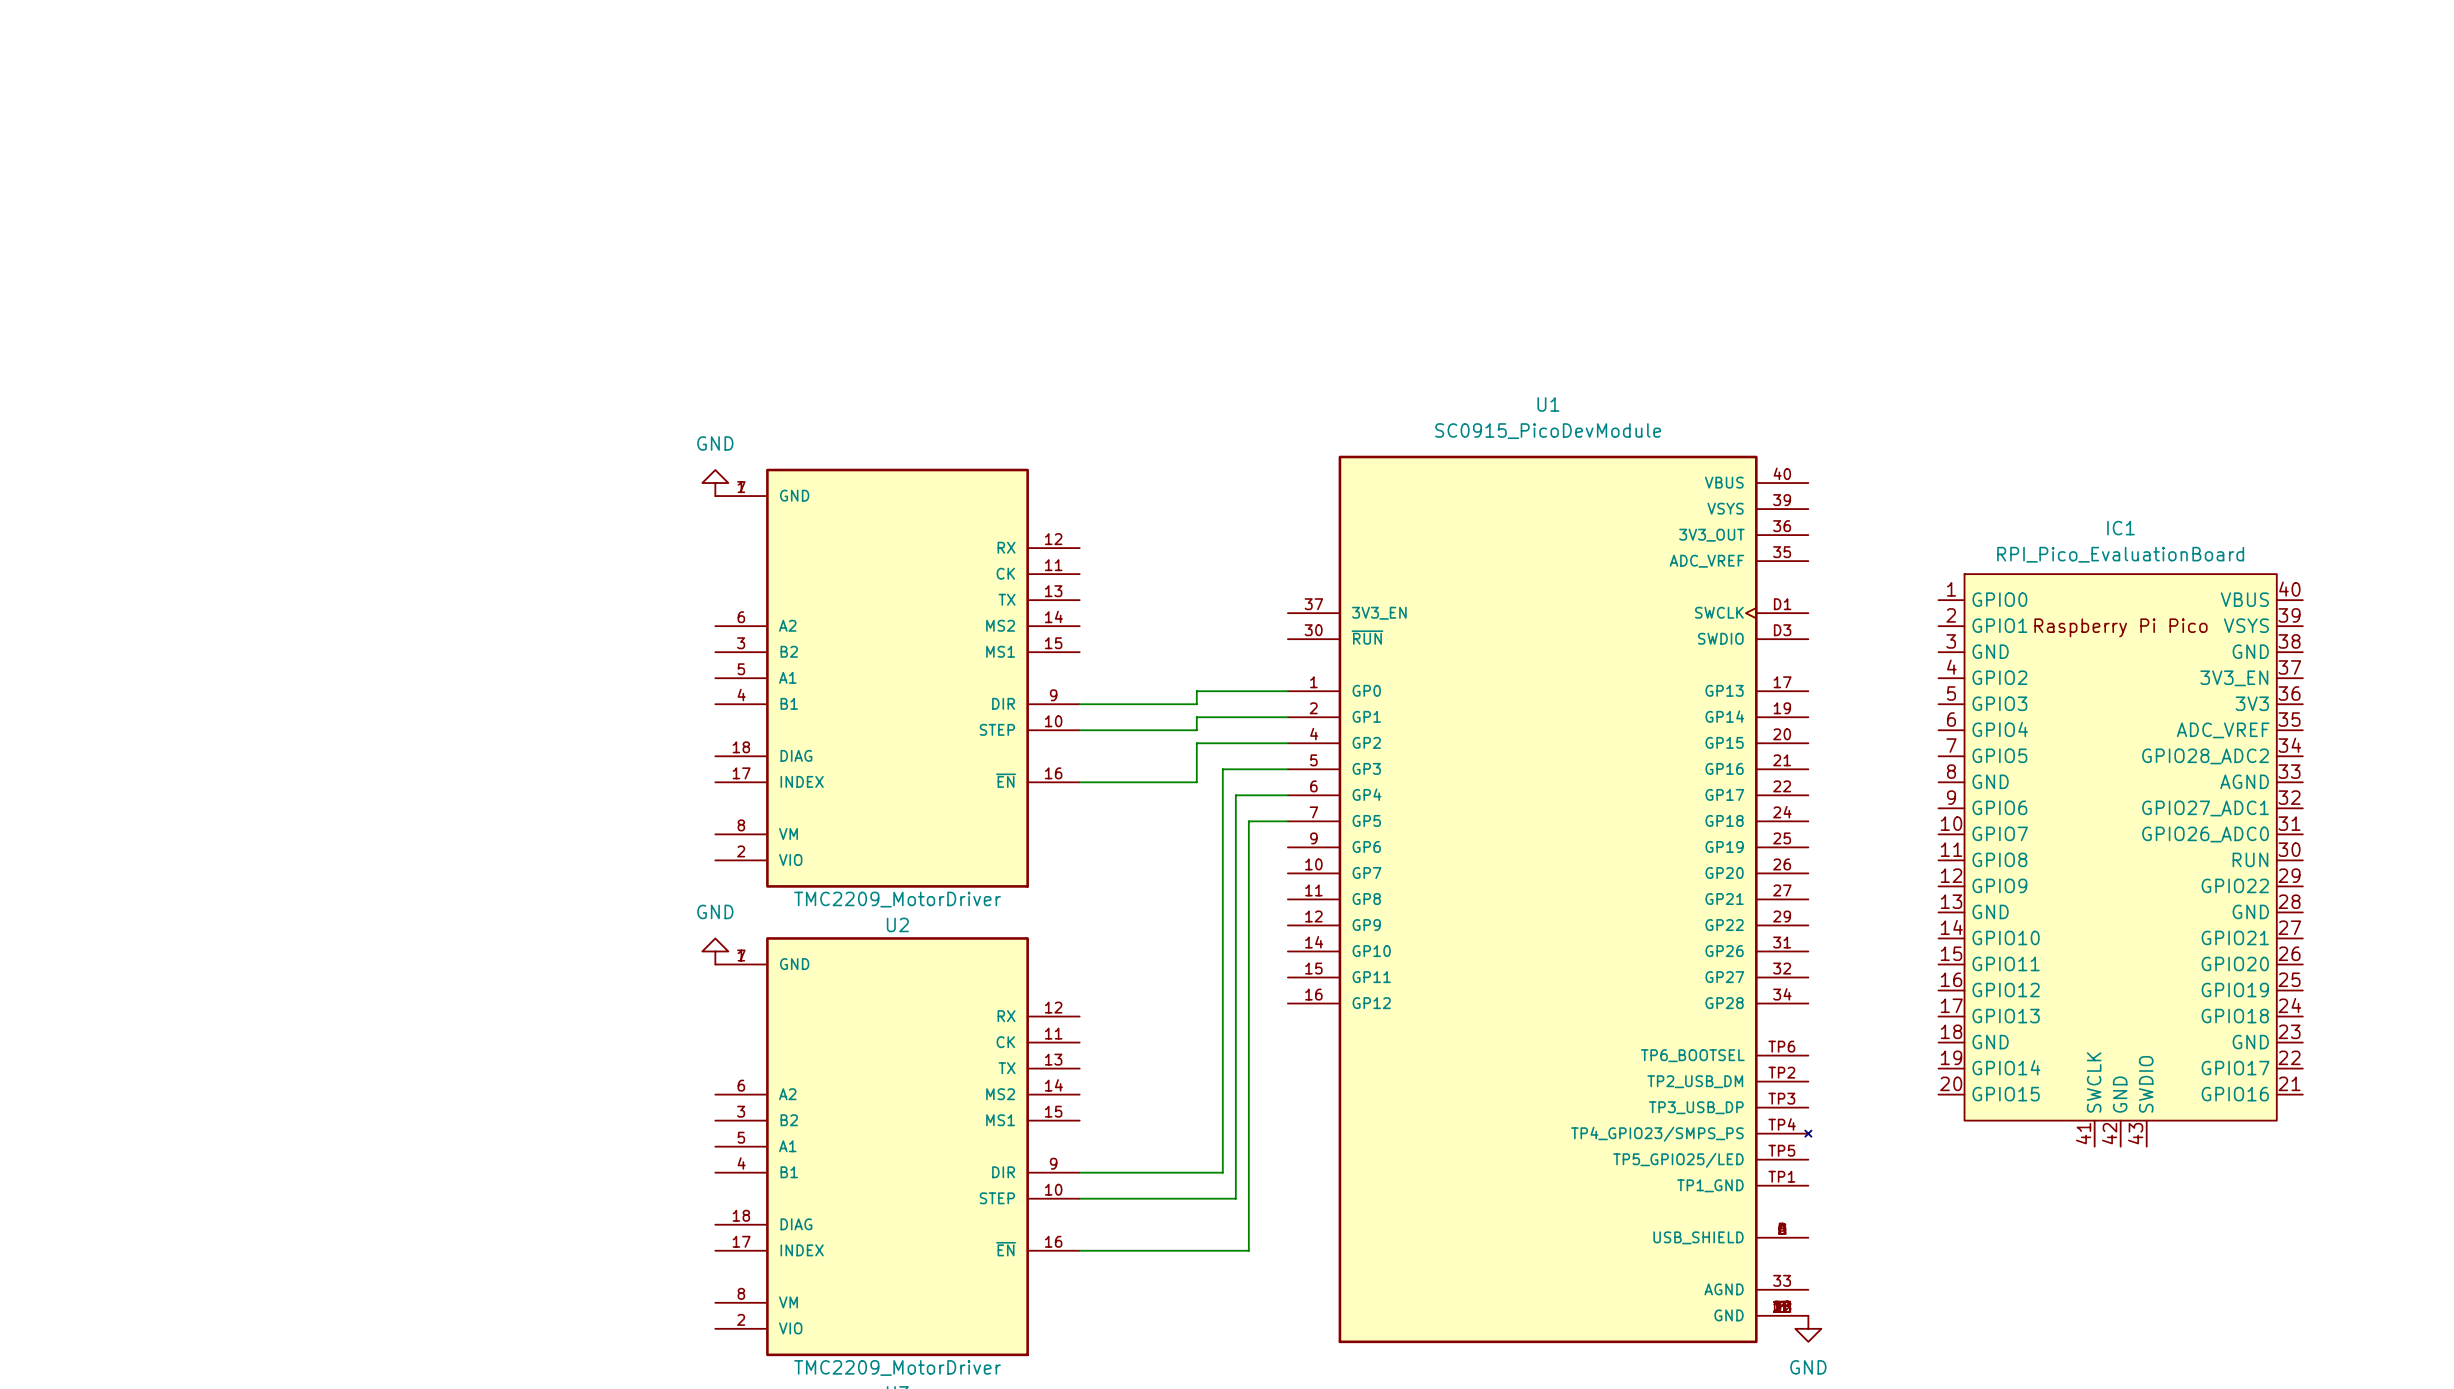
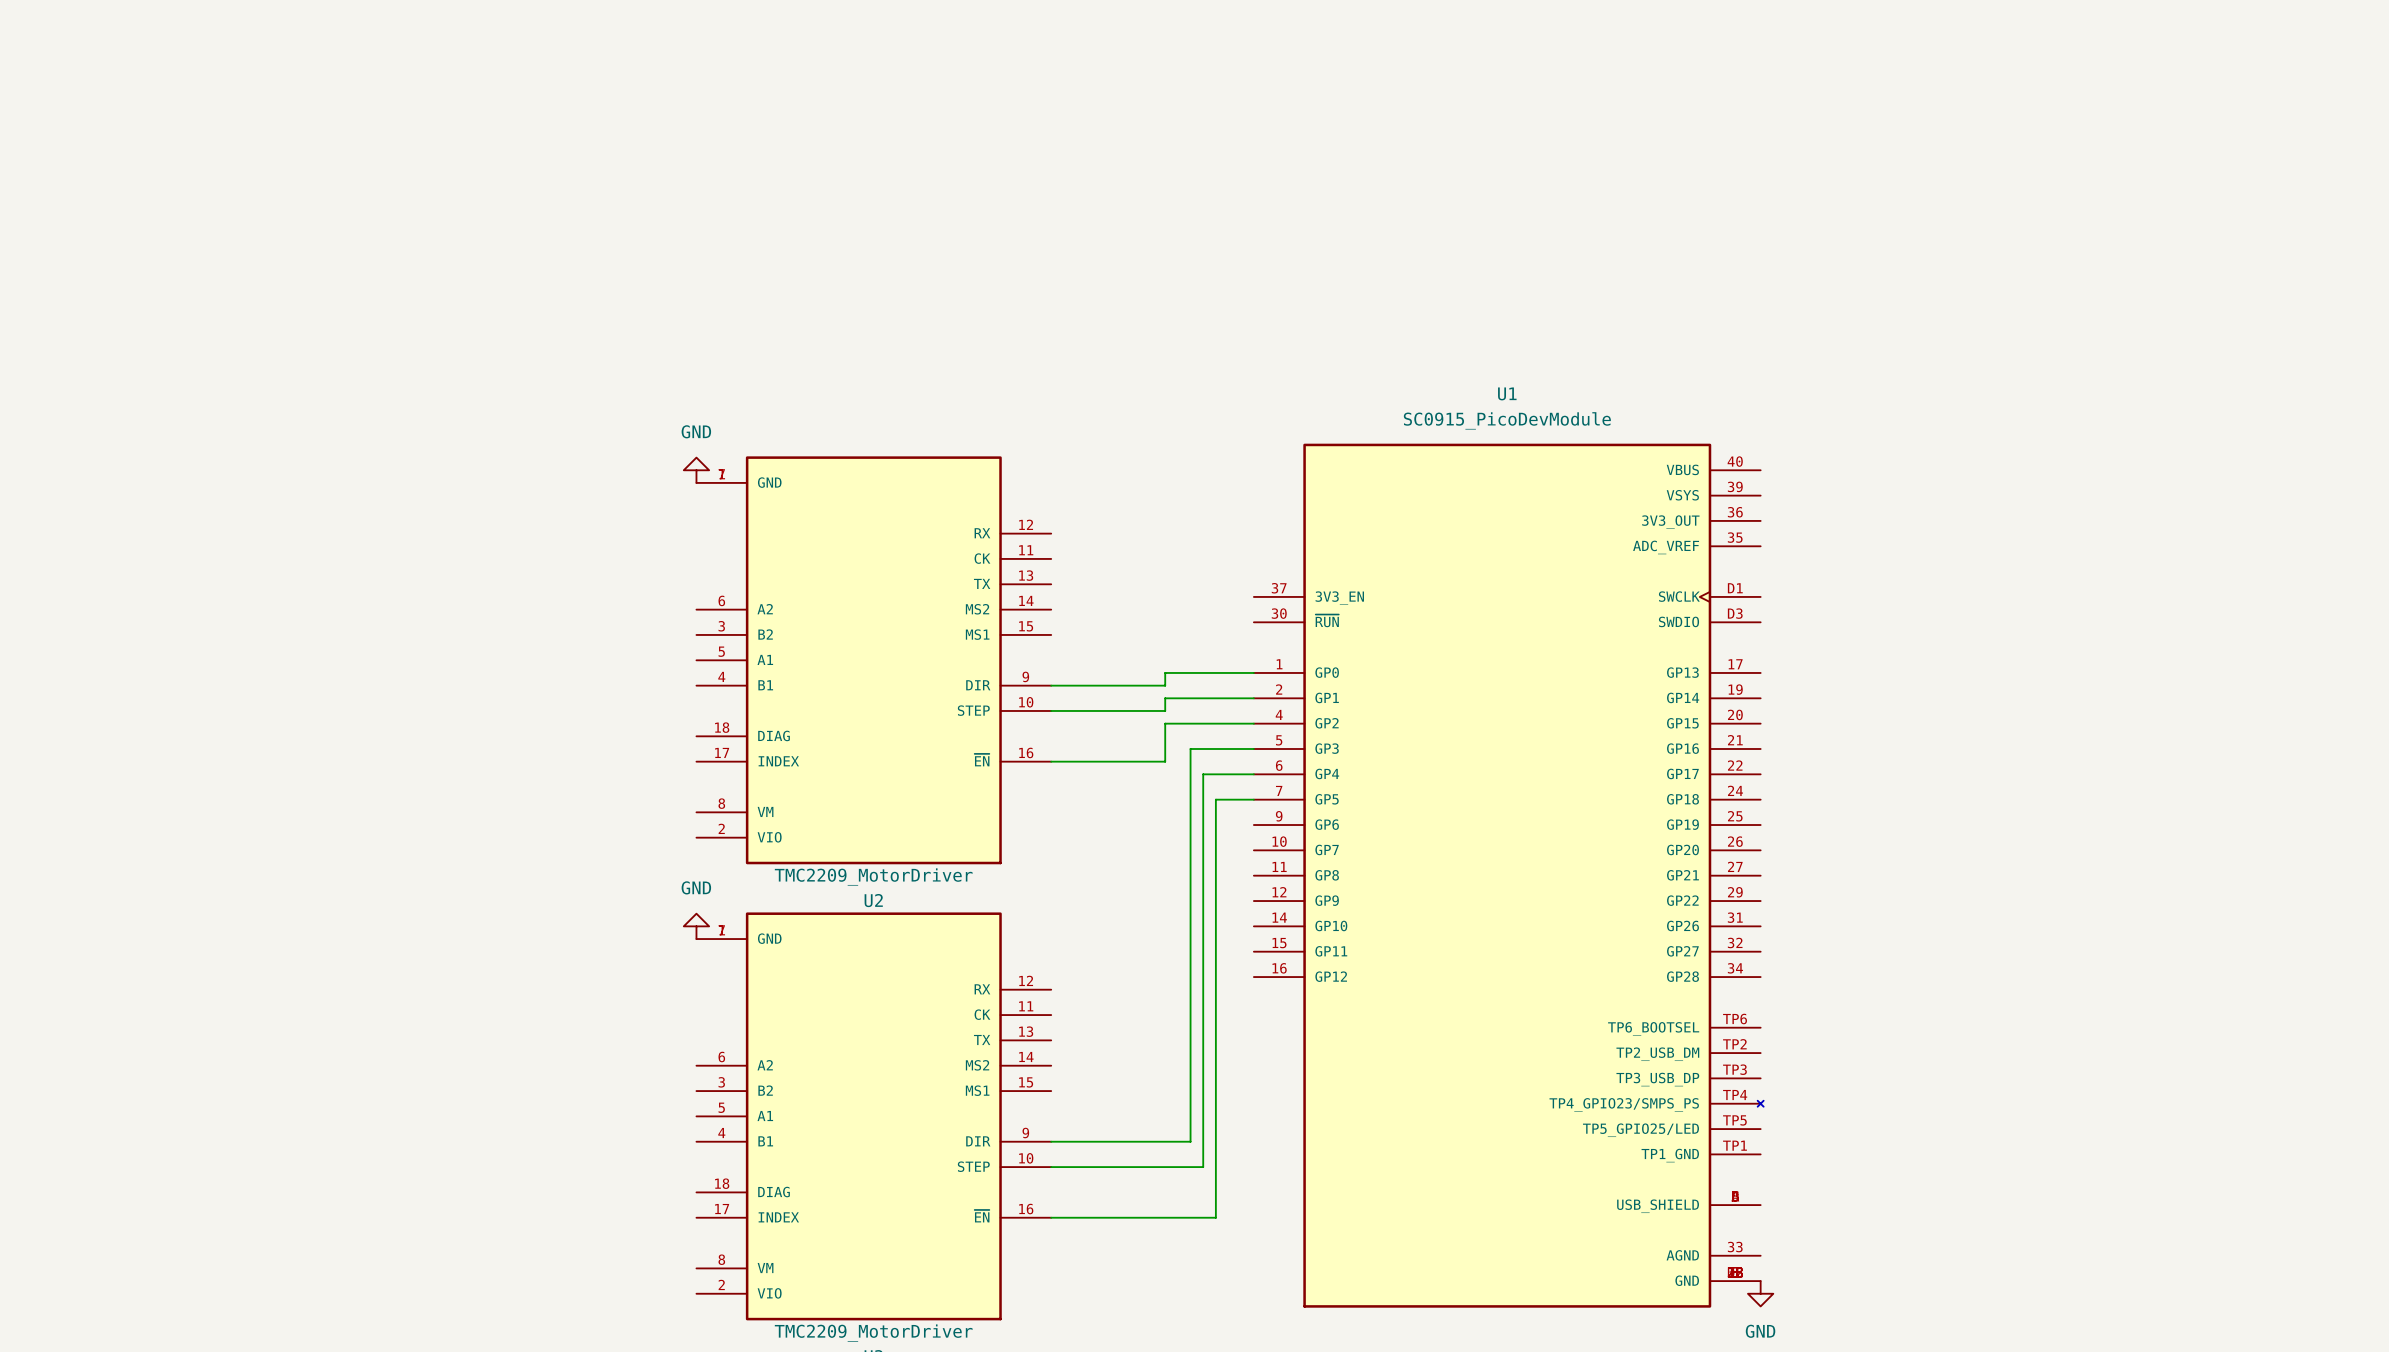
IC1: RPI_Pico_EvaluationBoard (2120, 860) -> none

